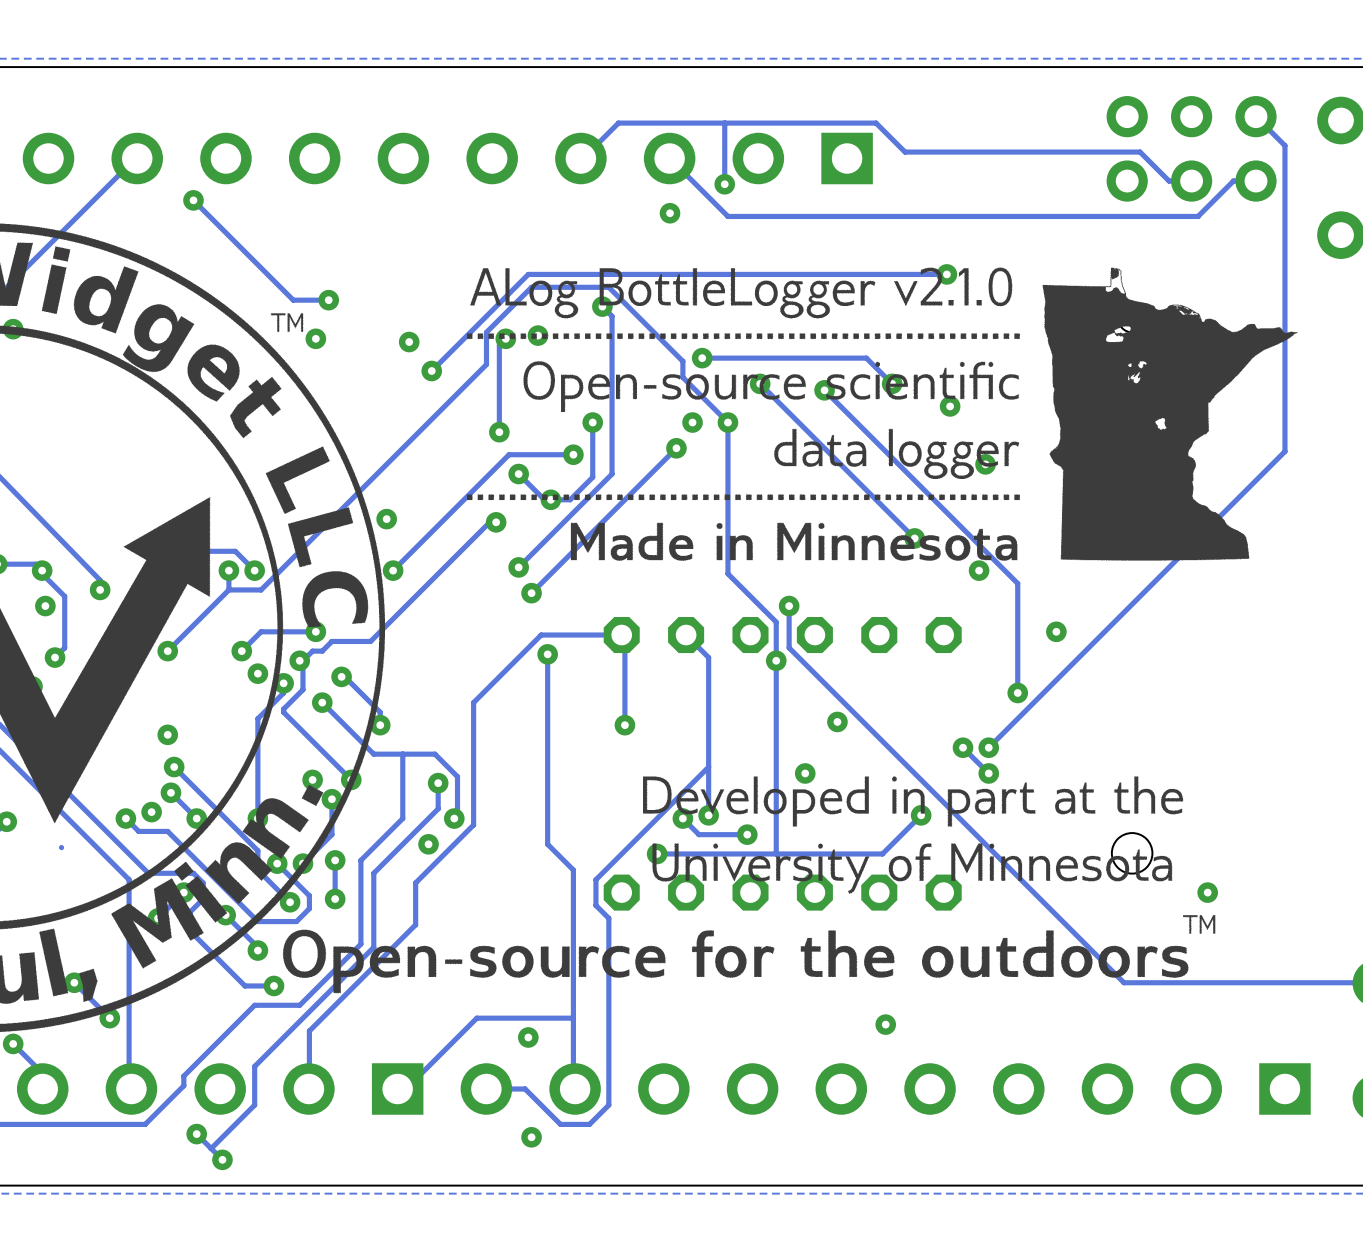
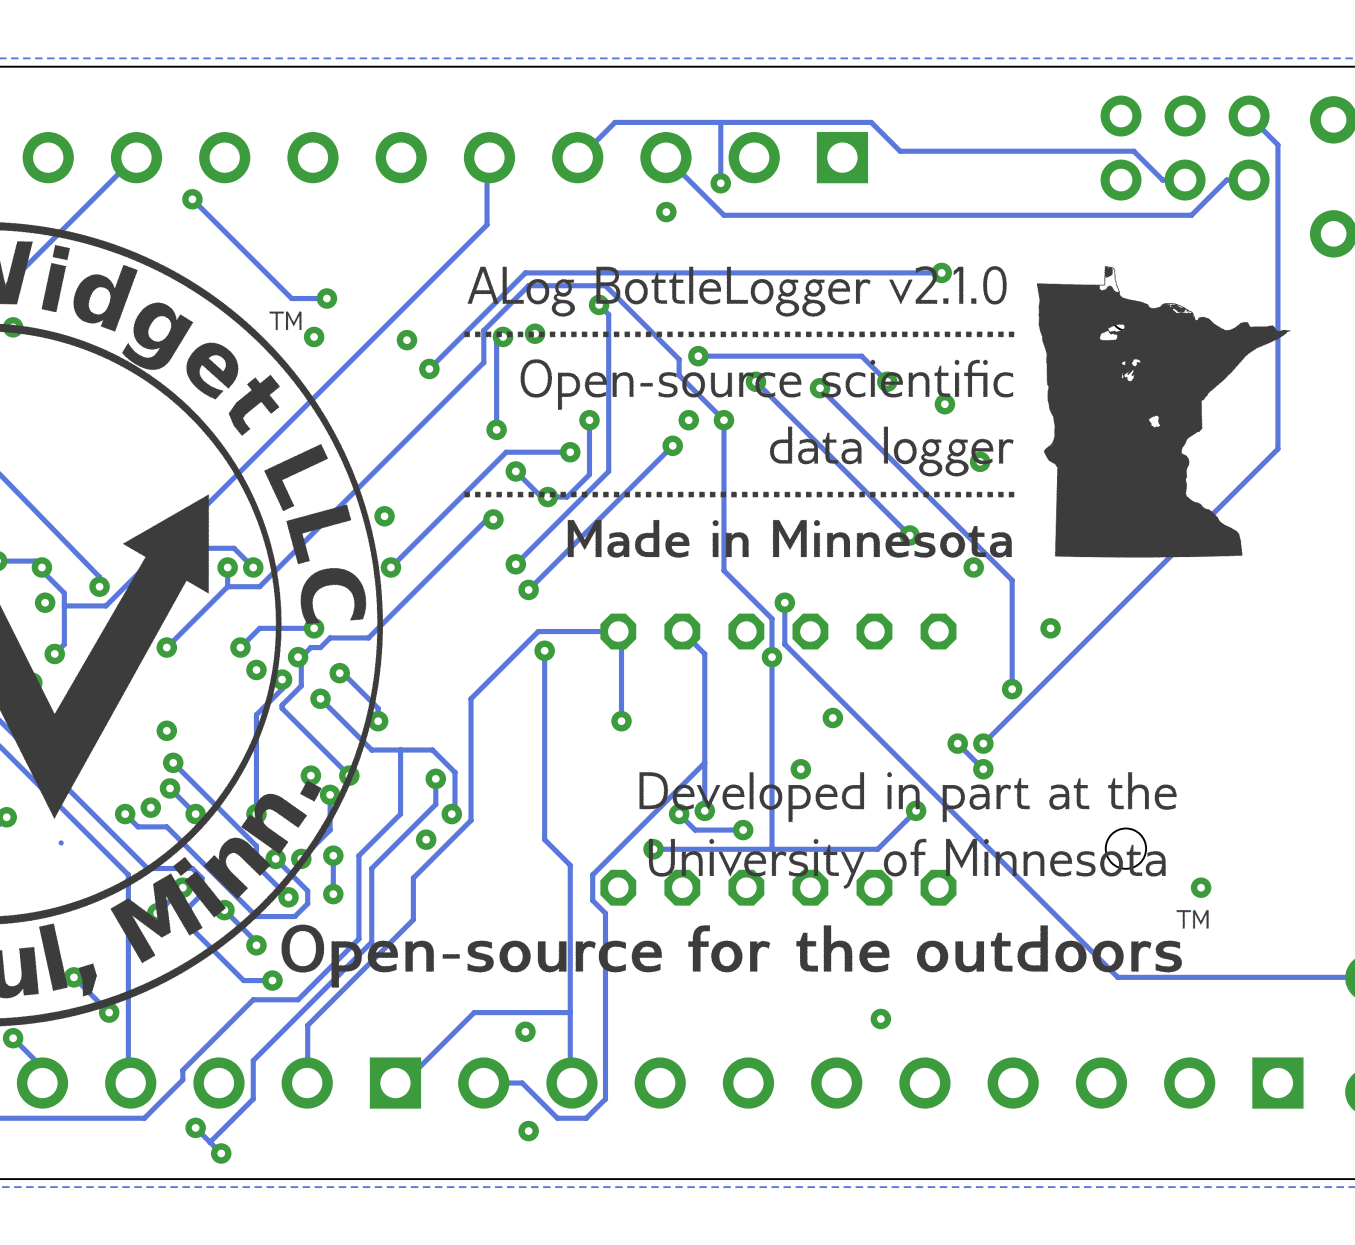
track: none -> (489, 157) (487, 157) (487, 224) (105, 605) (64, 605)

